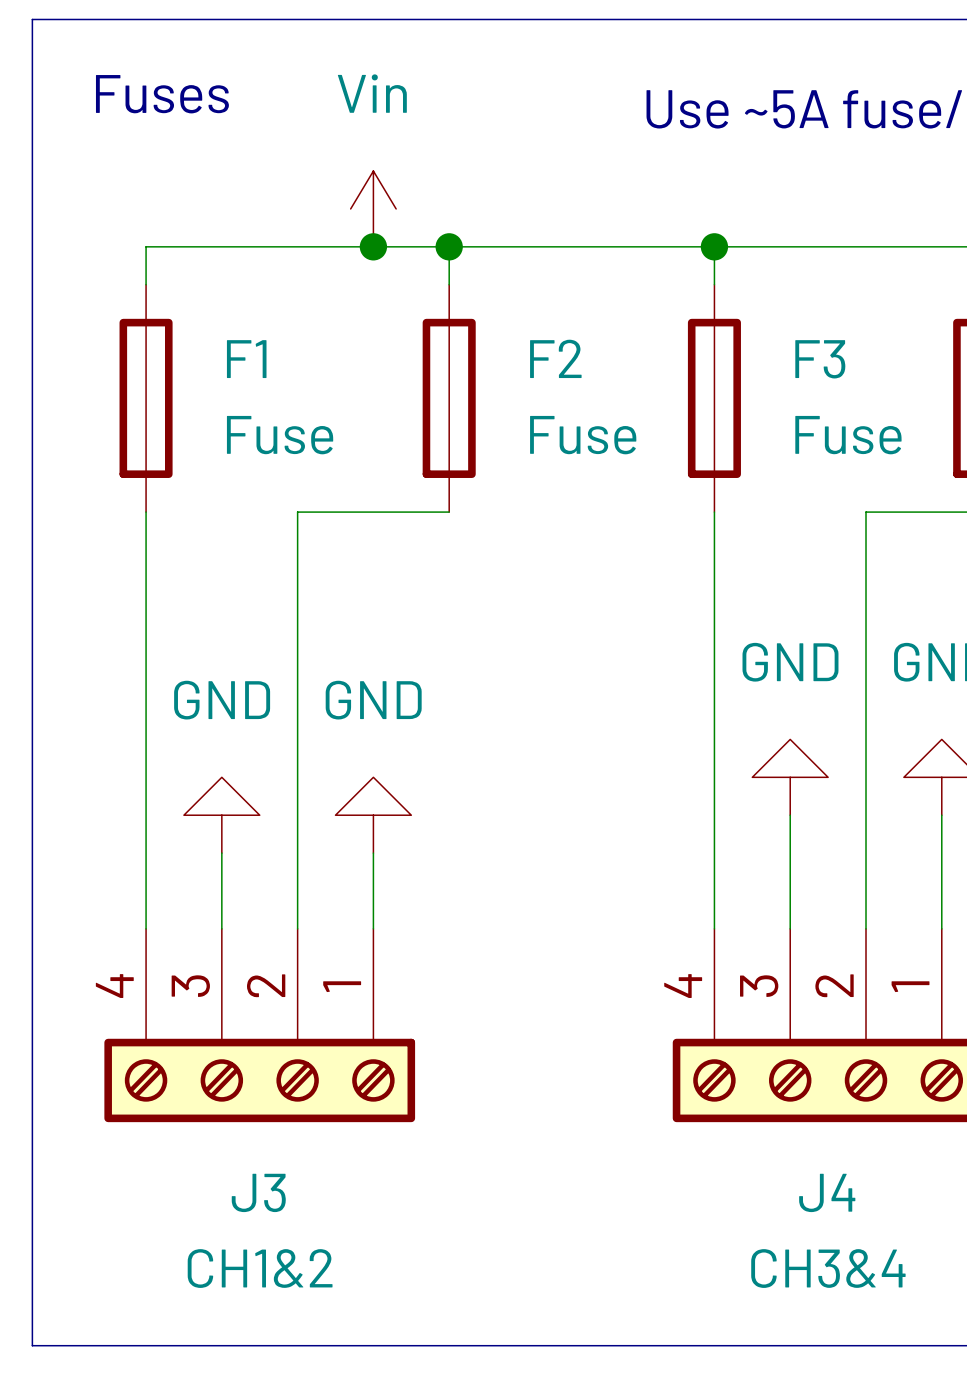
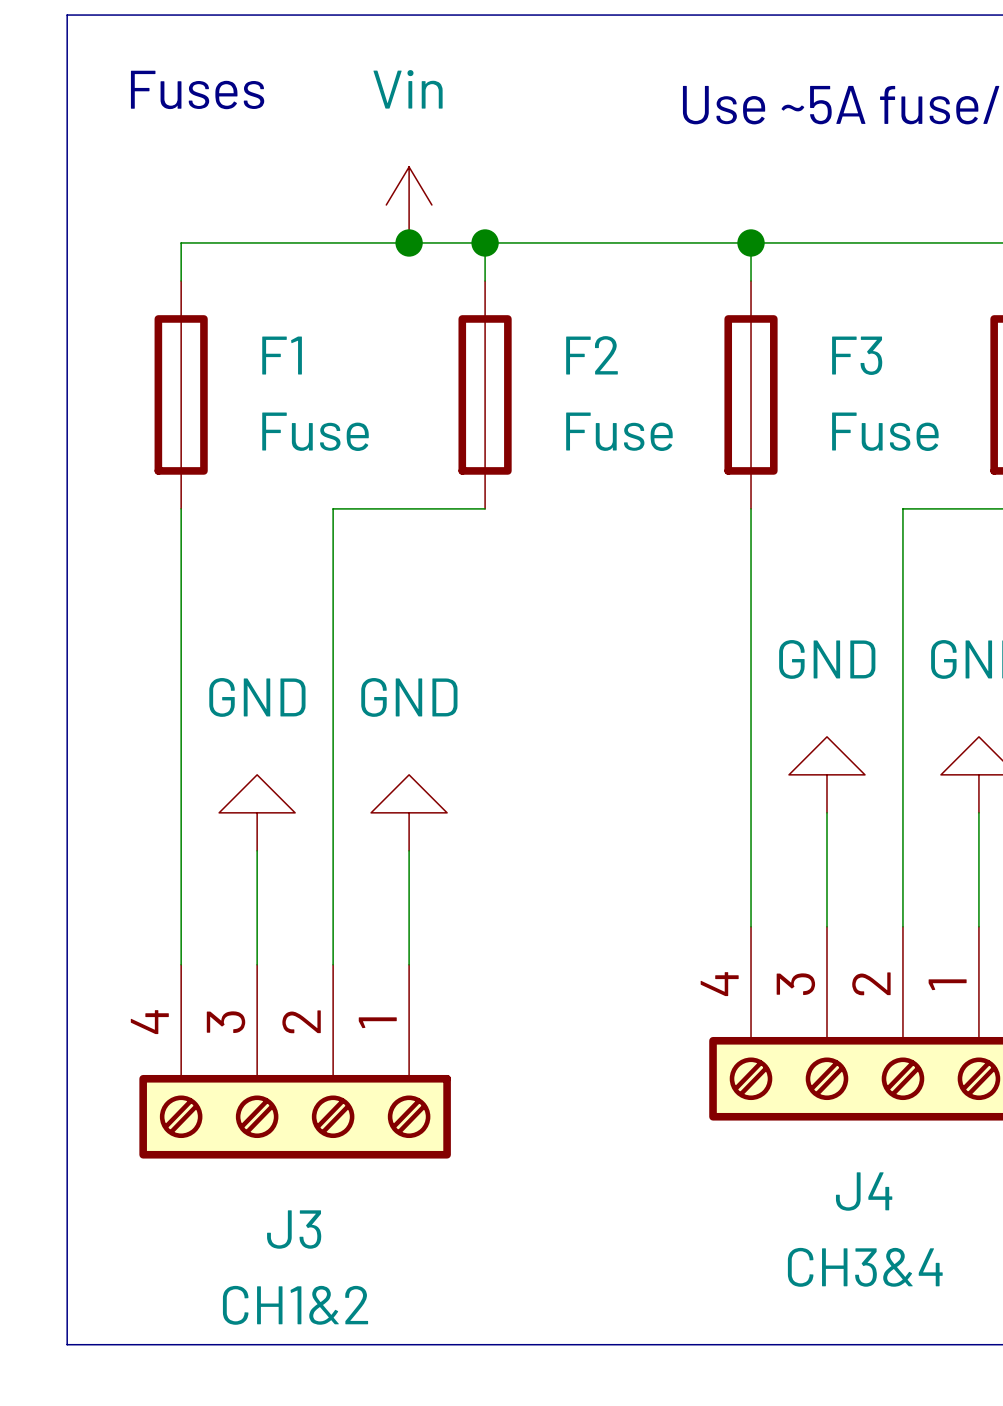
J3 position: (259, 1025) -> (295, 1061)

